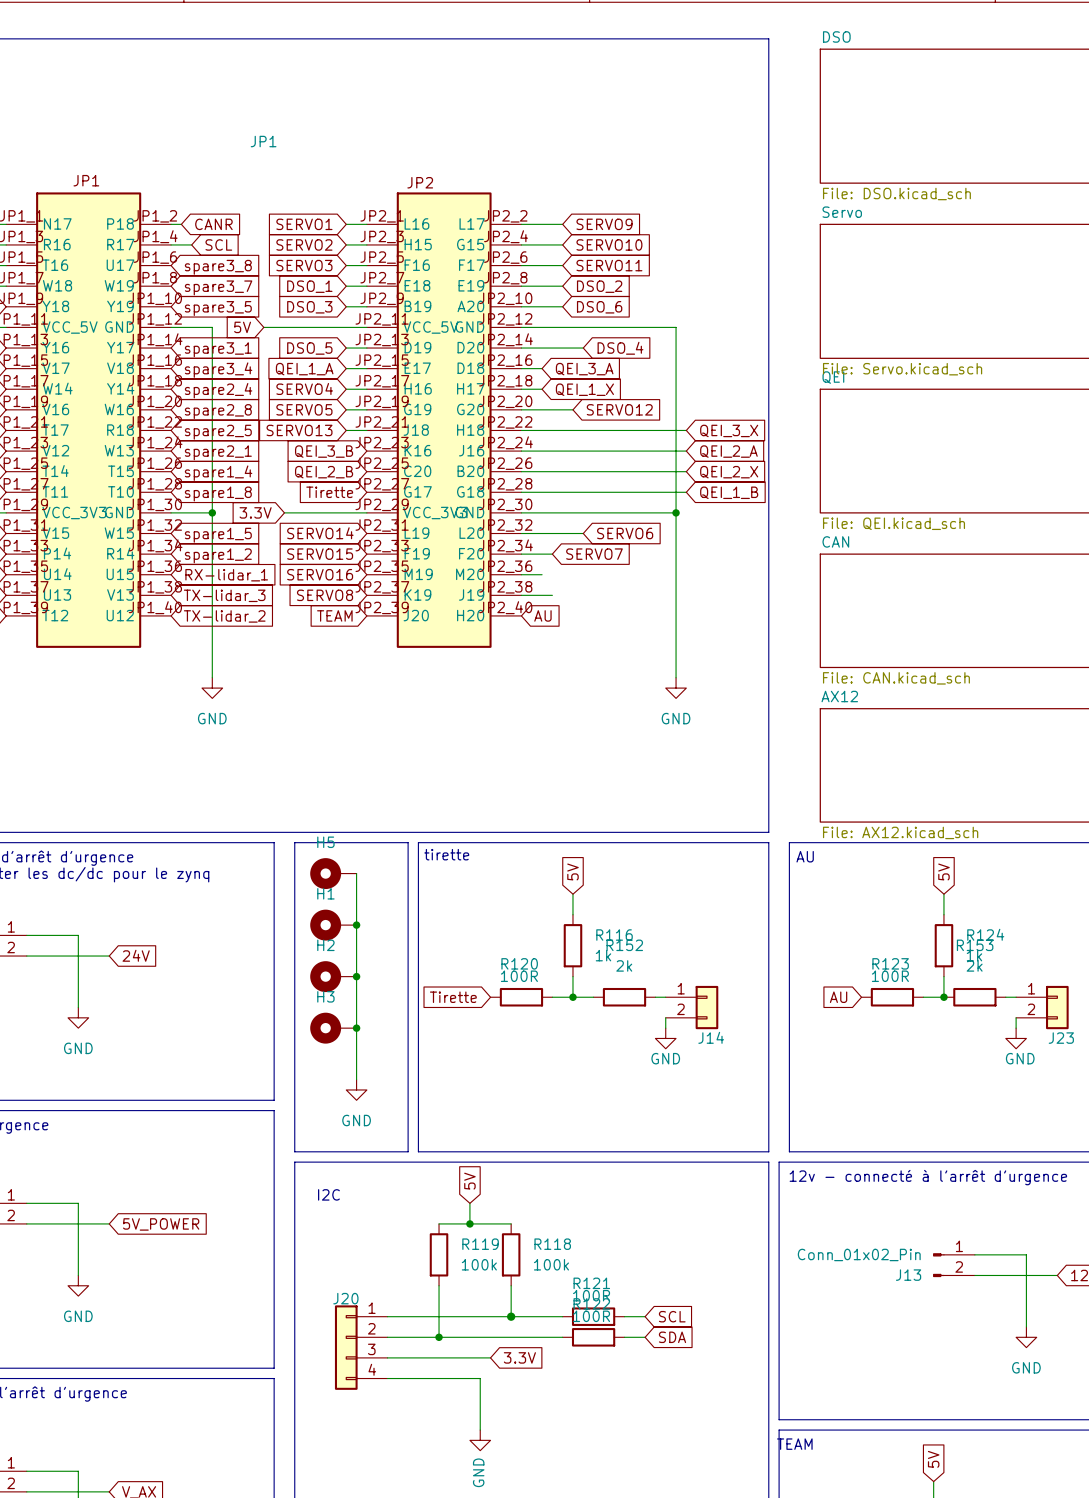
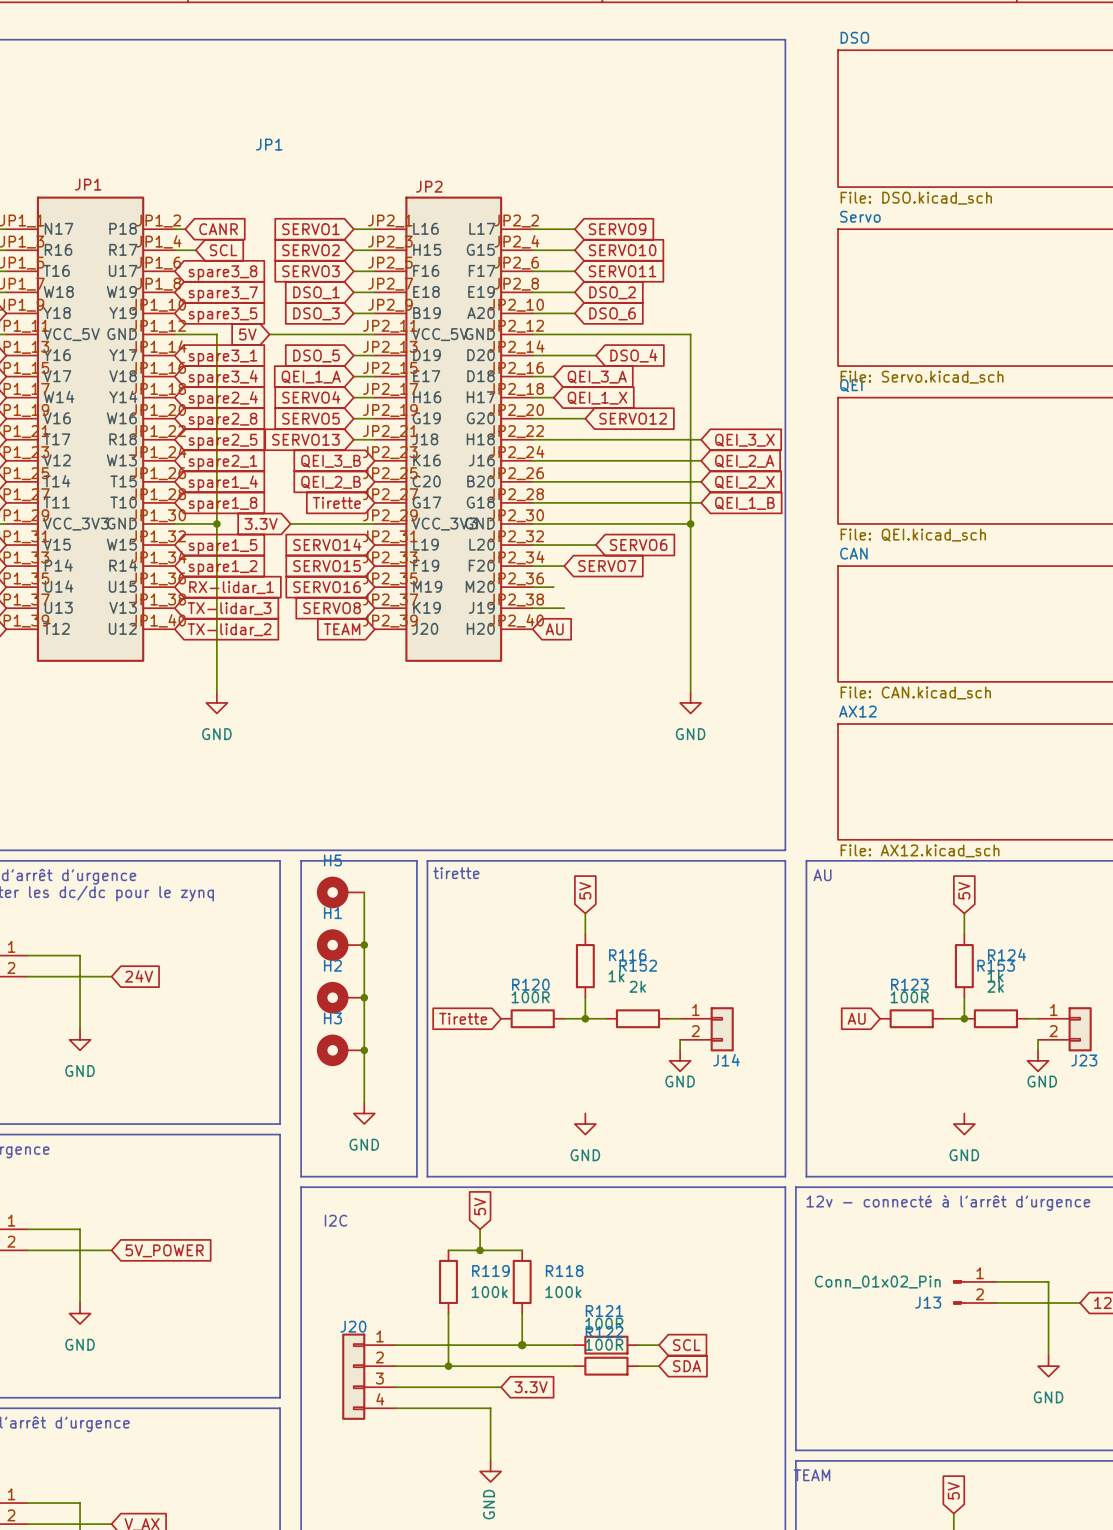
power symbol: none -> GND (585, 1124)
power symbol: none -> GND (964, 1124)

